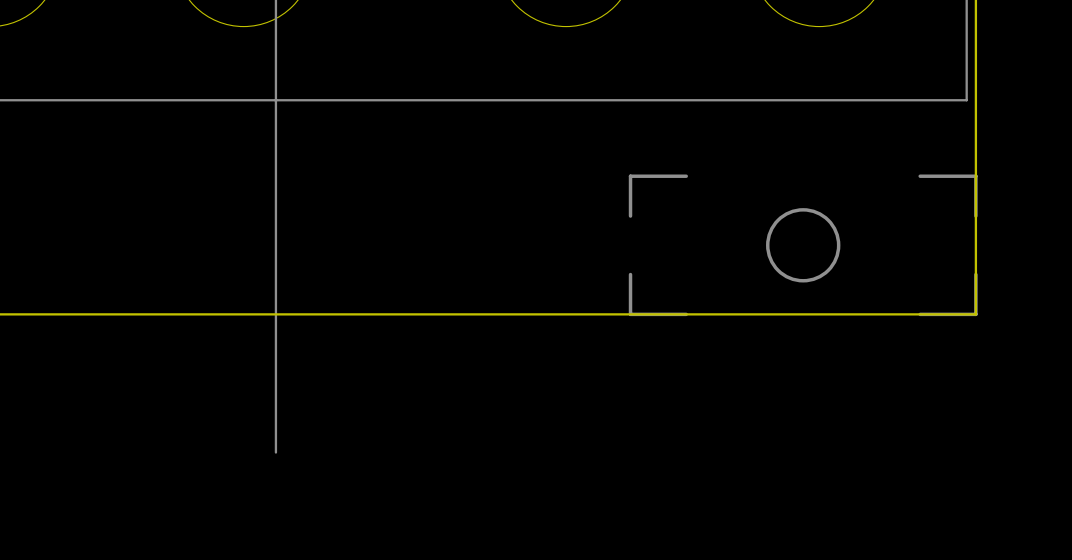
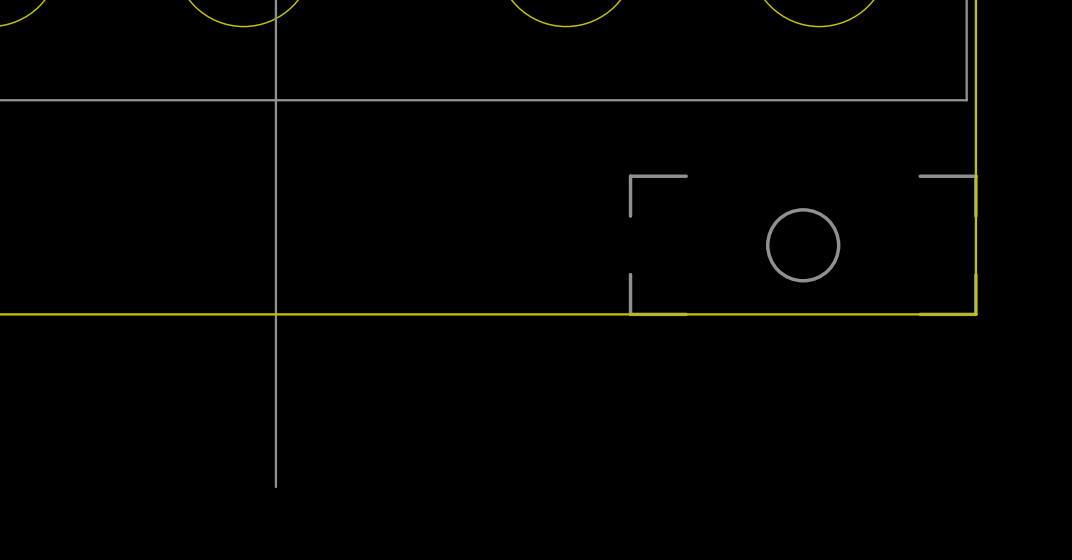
line: none -> (275, 452) (275, 487)

